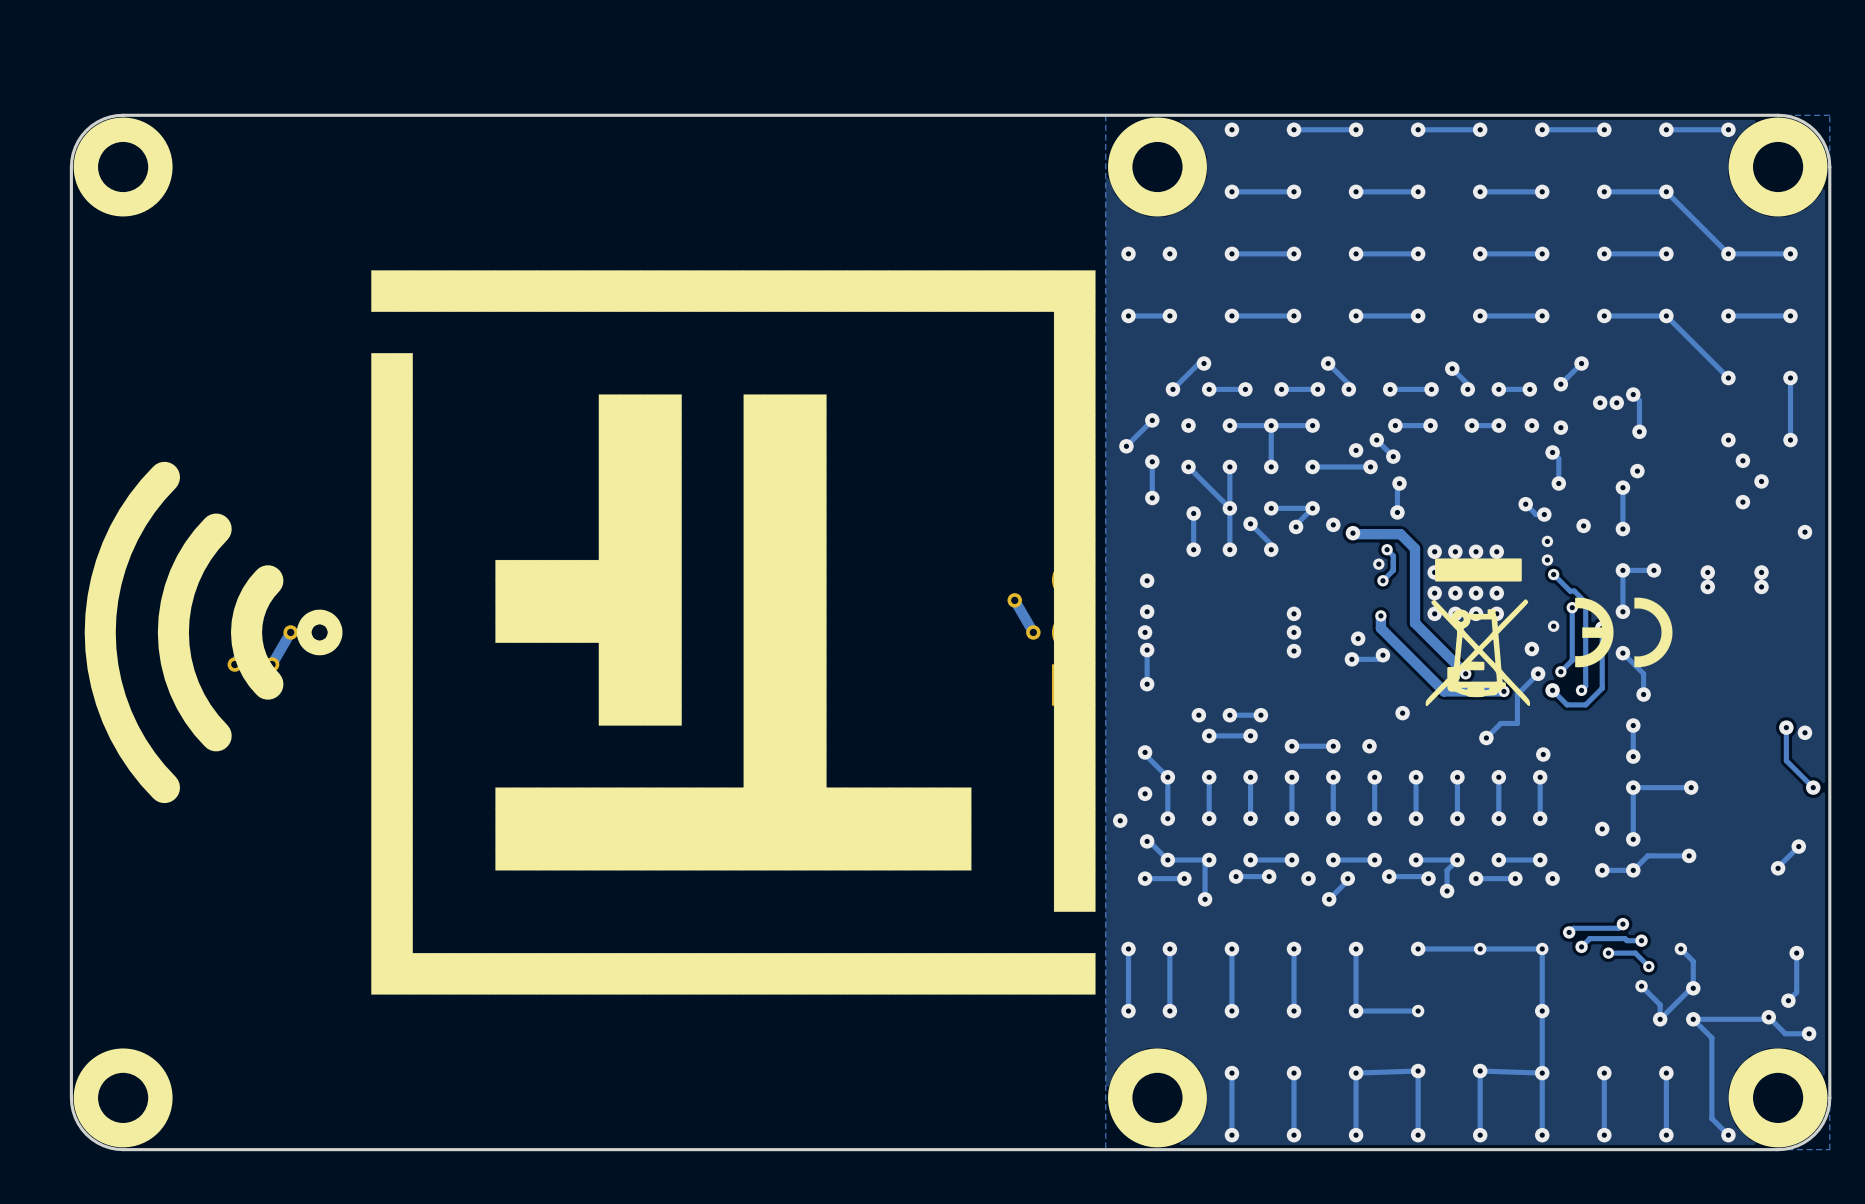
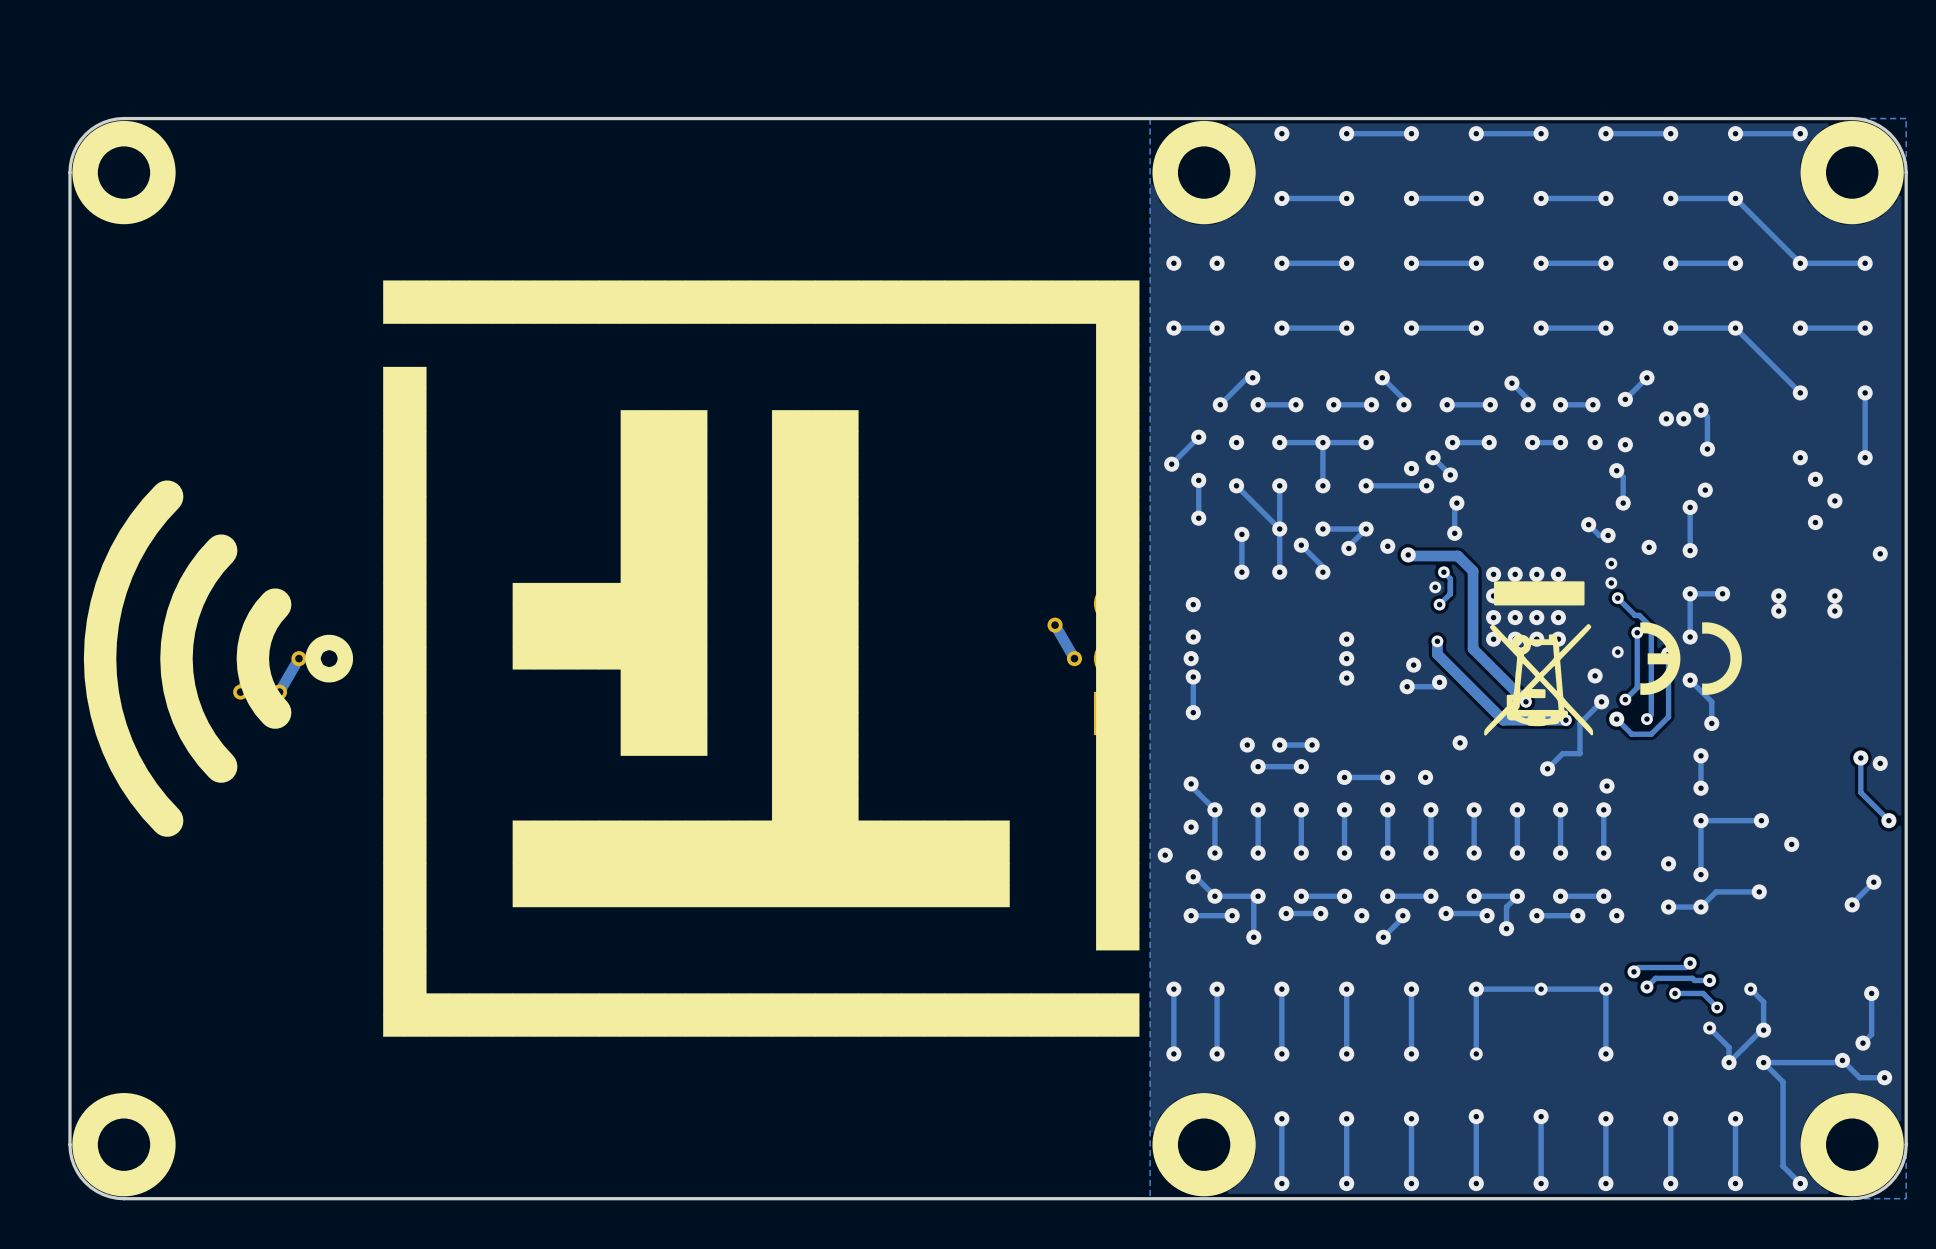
via: none -> (1791, 844)
track: (1418, 1011) (1356, 1011) -> (1476, 1053) (1476, 989)
track: (1542, 1011) (1542, 1073) (1480, 1071) (1480, 1073) -> none
track: (1418, 1073) (1418, 1071) (1356, 1073) -> none

